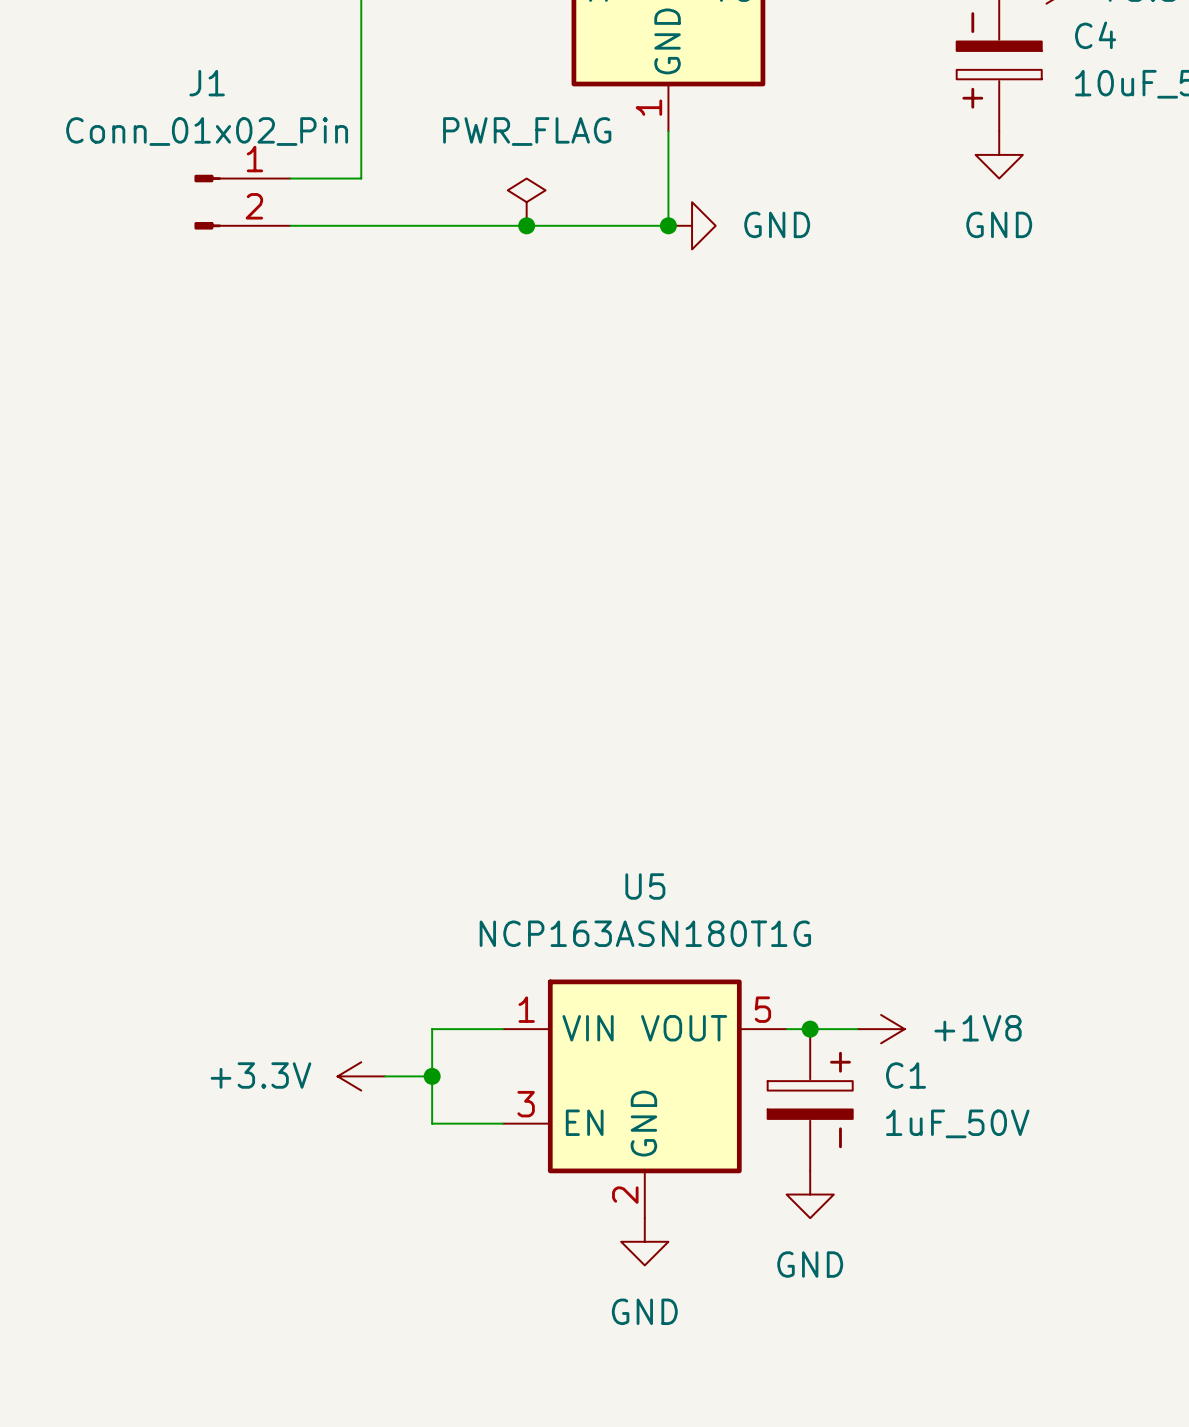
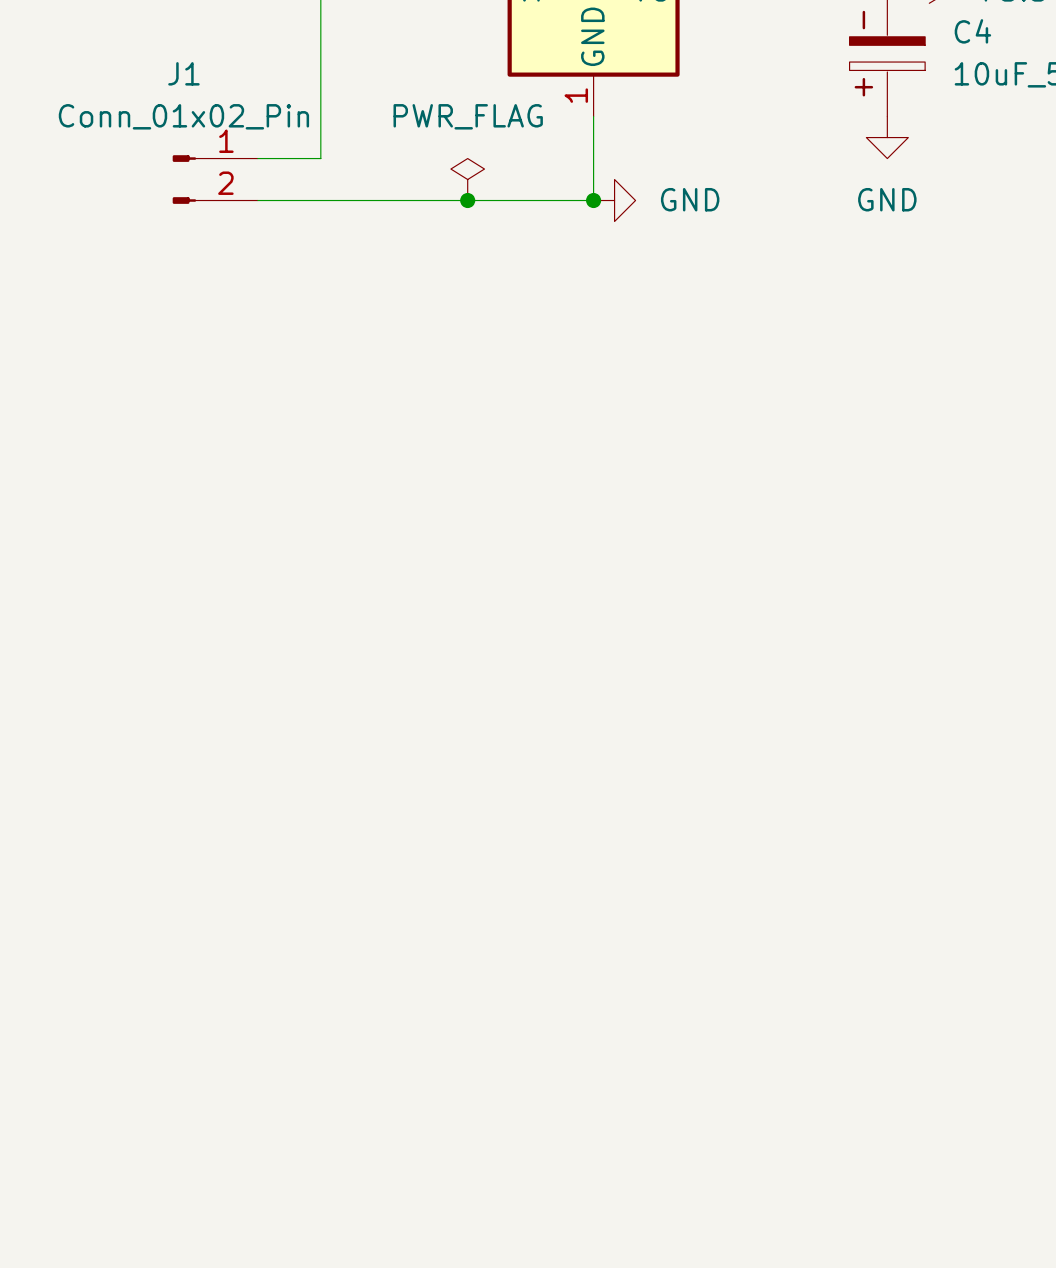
wire: (503, 1029) (432, 1029) (432, 1123) (503, 1123) -> none
wire: (786, 1029) (857, 1029) -> none
junction: (810, 1029) -> none
power symbol: +1V8 (881, 1029) -> none
power symbol: +3.3V (361, 1076) -> none
wire: (384, 1076) (432, 1076) -> none
junction: (432, 1076) -> none
U5: NCP163ASN180T1G (644, 1098) -> none
C1: 1uF_50V (810, 1100) -> none
power symbol: GND (810, 1194) -> none
power symbol: GND (644, 1241) -> none

